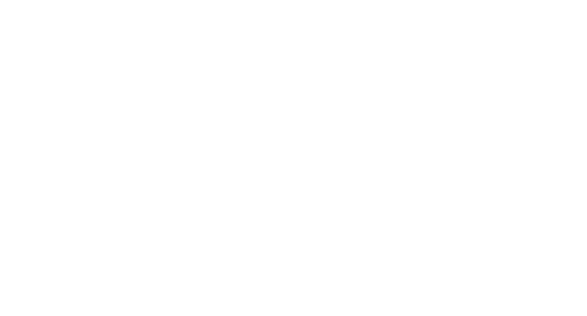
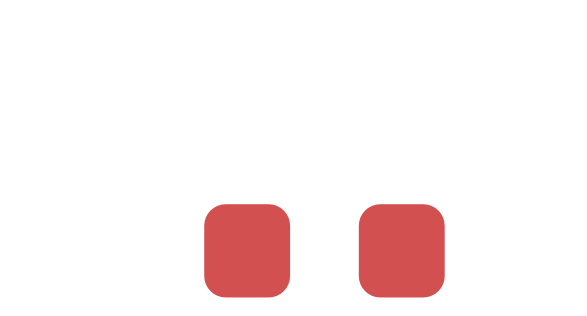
part: none -> (324, 250)

